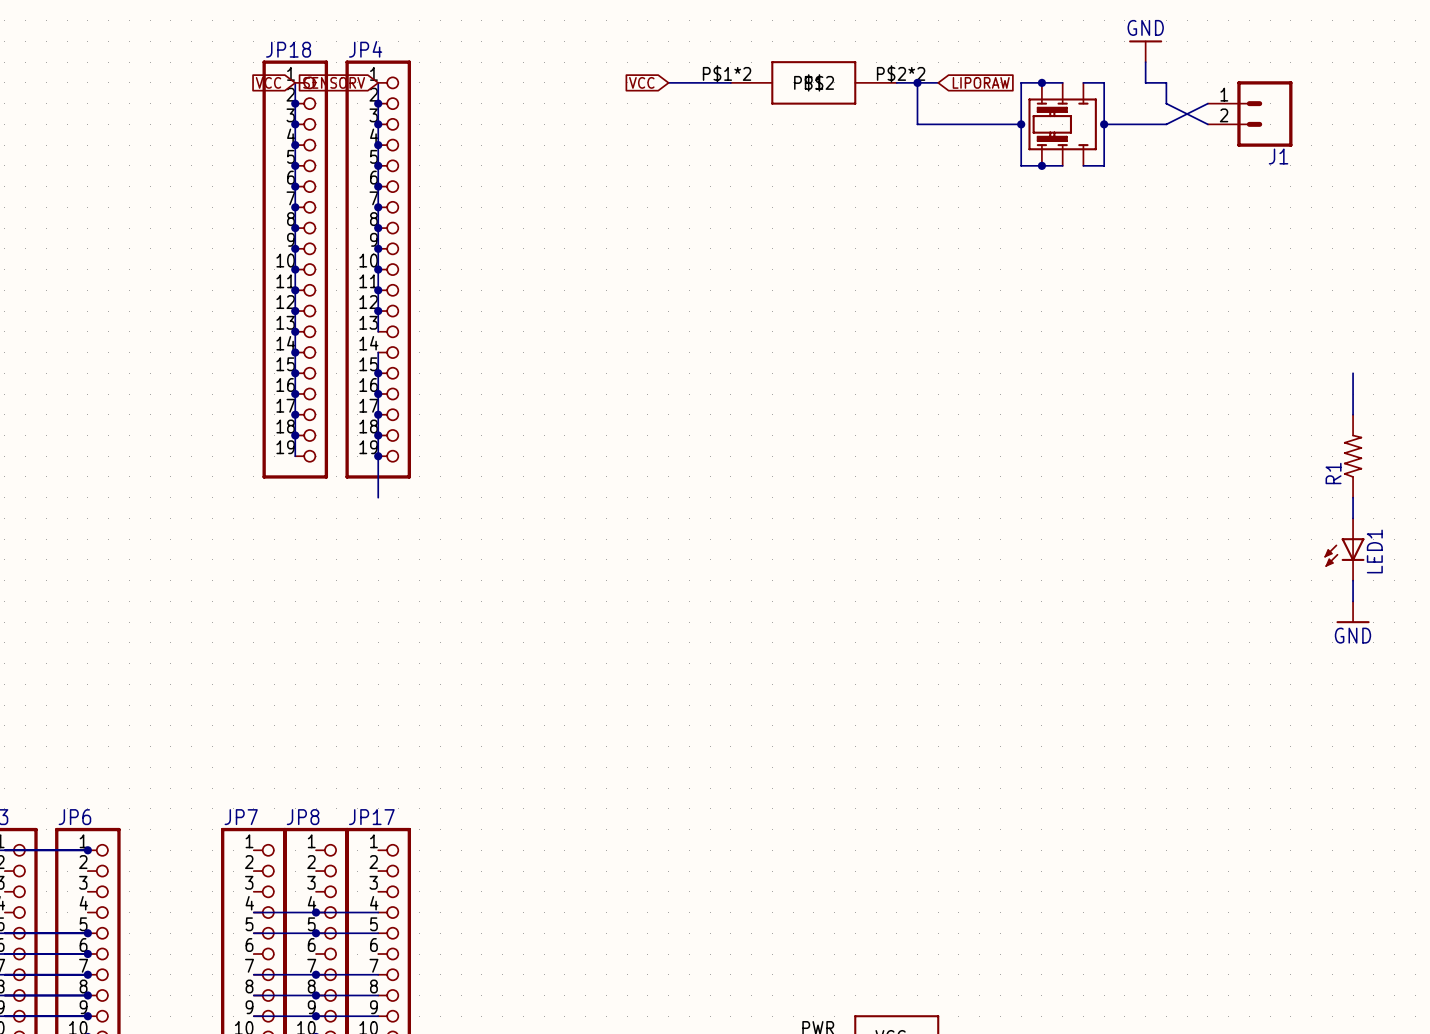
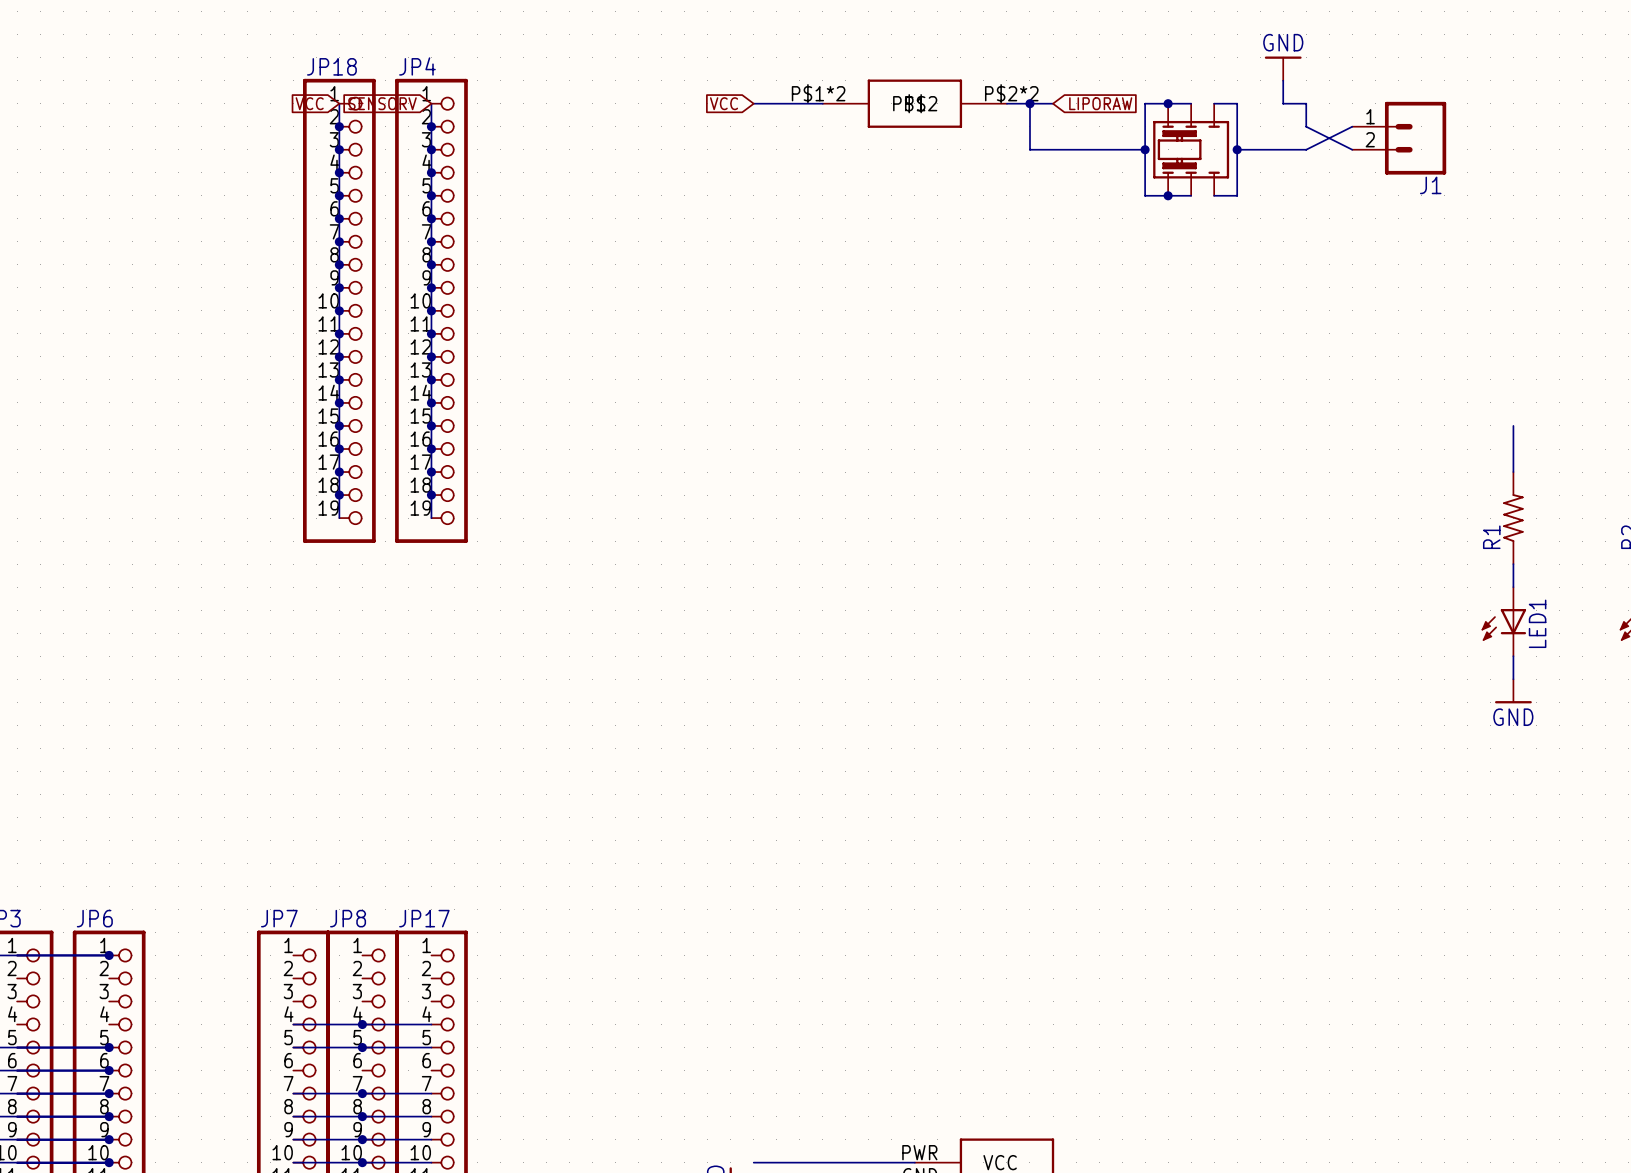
wire: none -> (431, 379) (431, 402)
junction: none -> (431, 379)
junction: none -> (431, 402)
wire: (378, 456) (378, 497) -> none
junction: (378, 456) -> none

